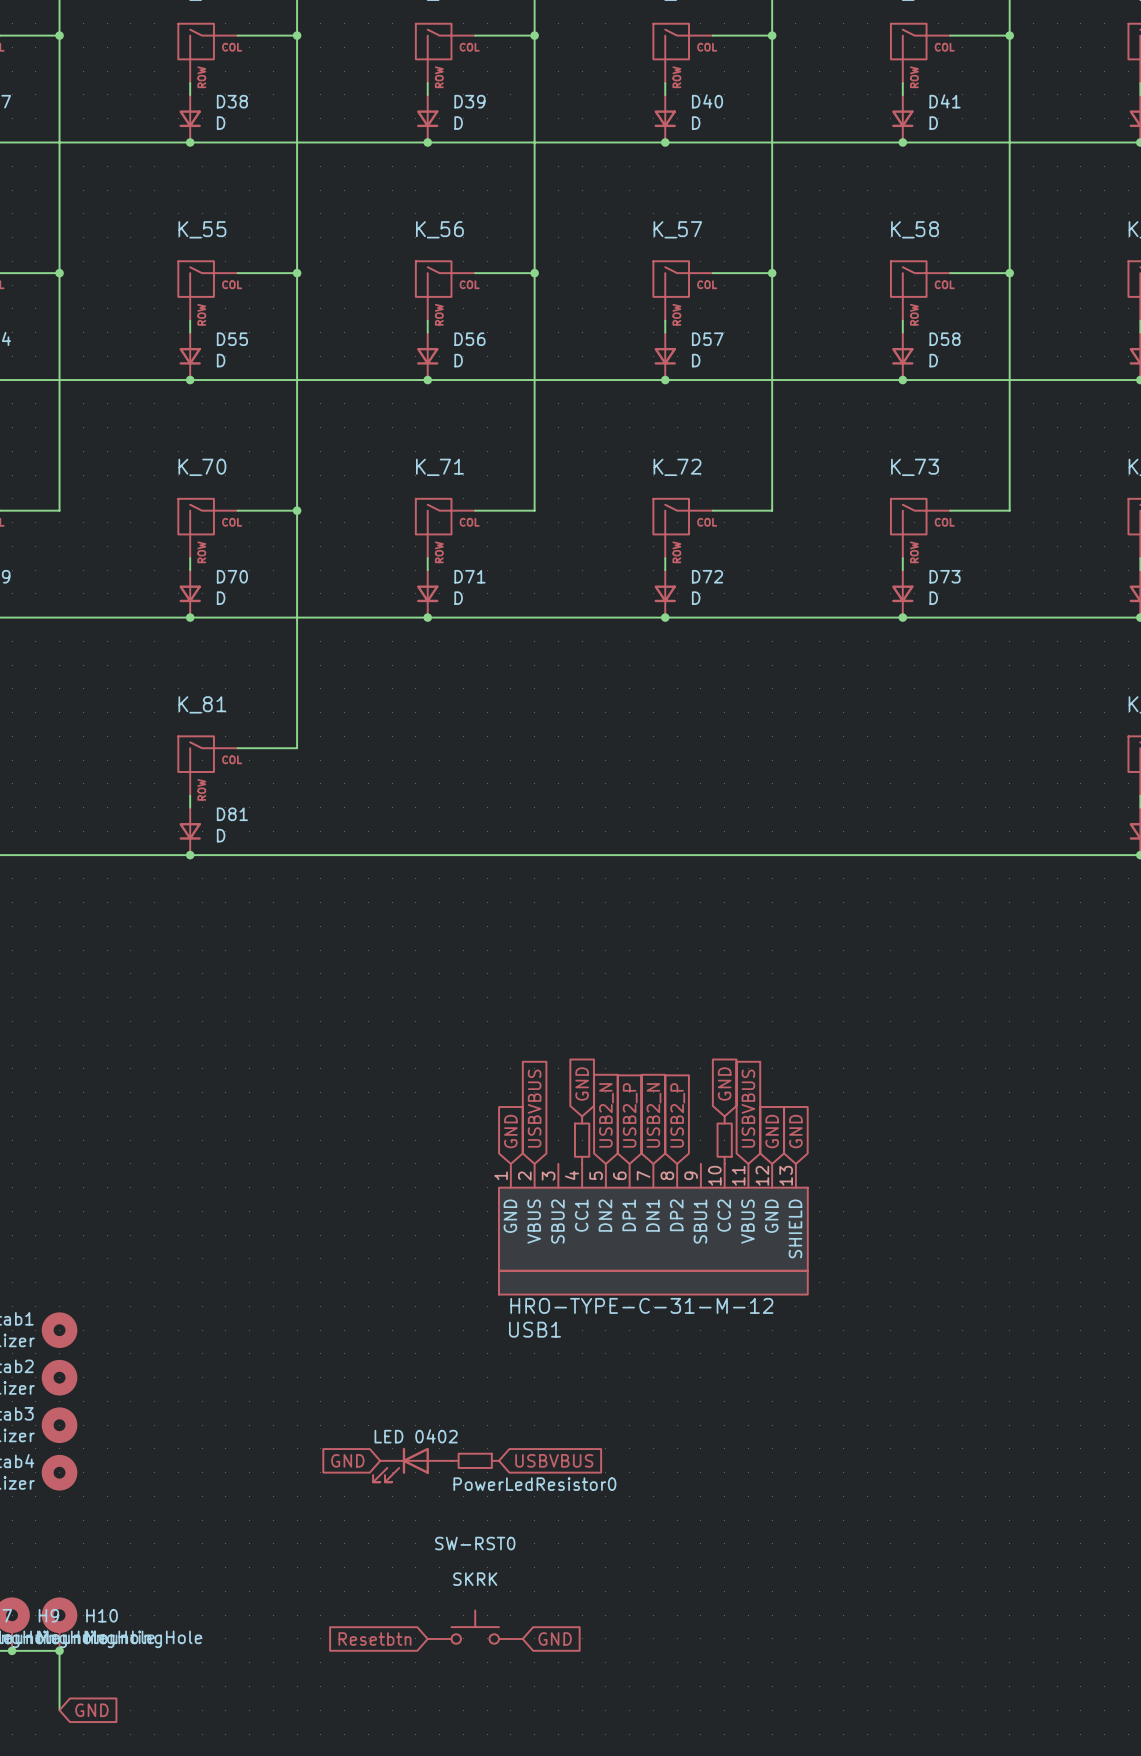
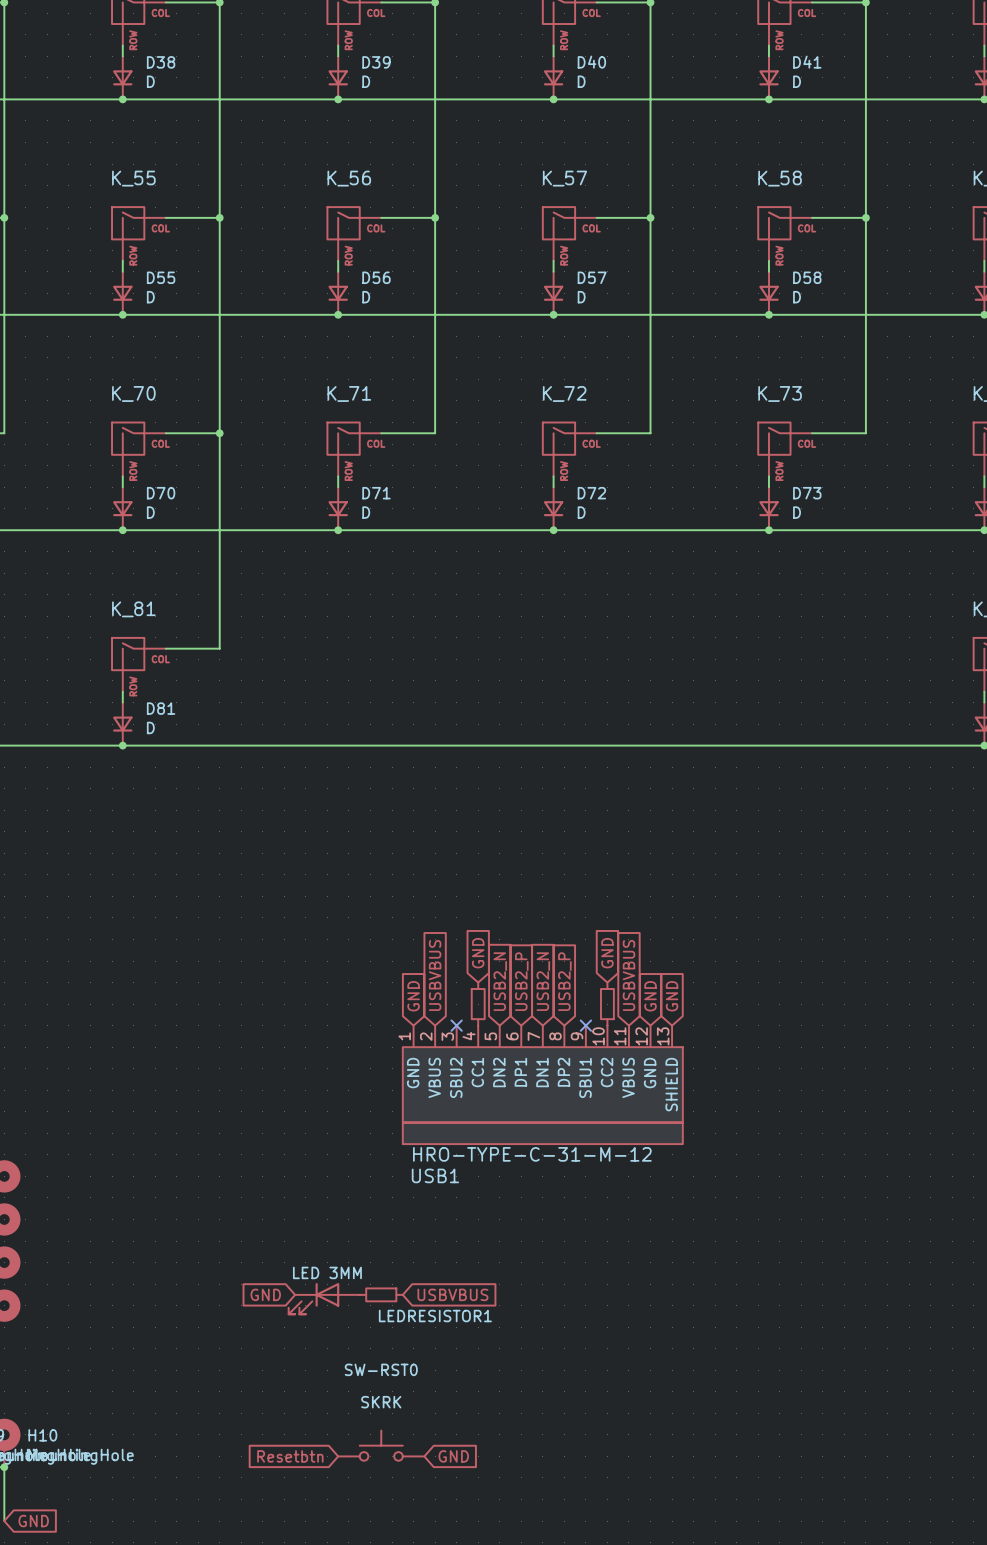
no-connect mark: none -> (456, 1025)
no-connect mark: none -> (585, 1025)
part value: LED 0402 (416, 1436) -> LED 3MM (327, 1272)
PowerLedResistor0 name: PowerLedResistor0 (534, 1484) -> LEDRESISTOR1 (435, 1316)

